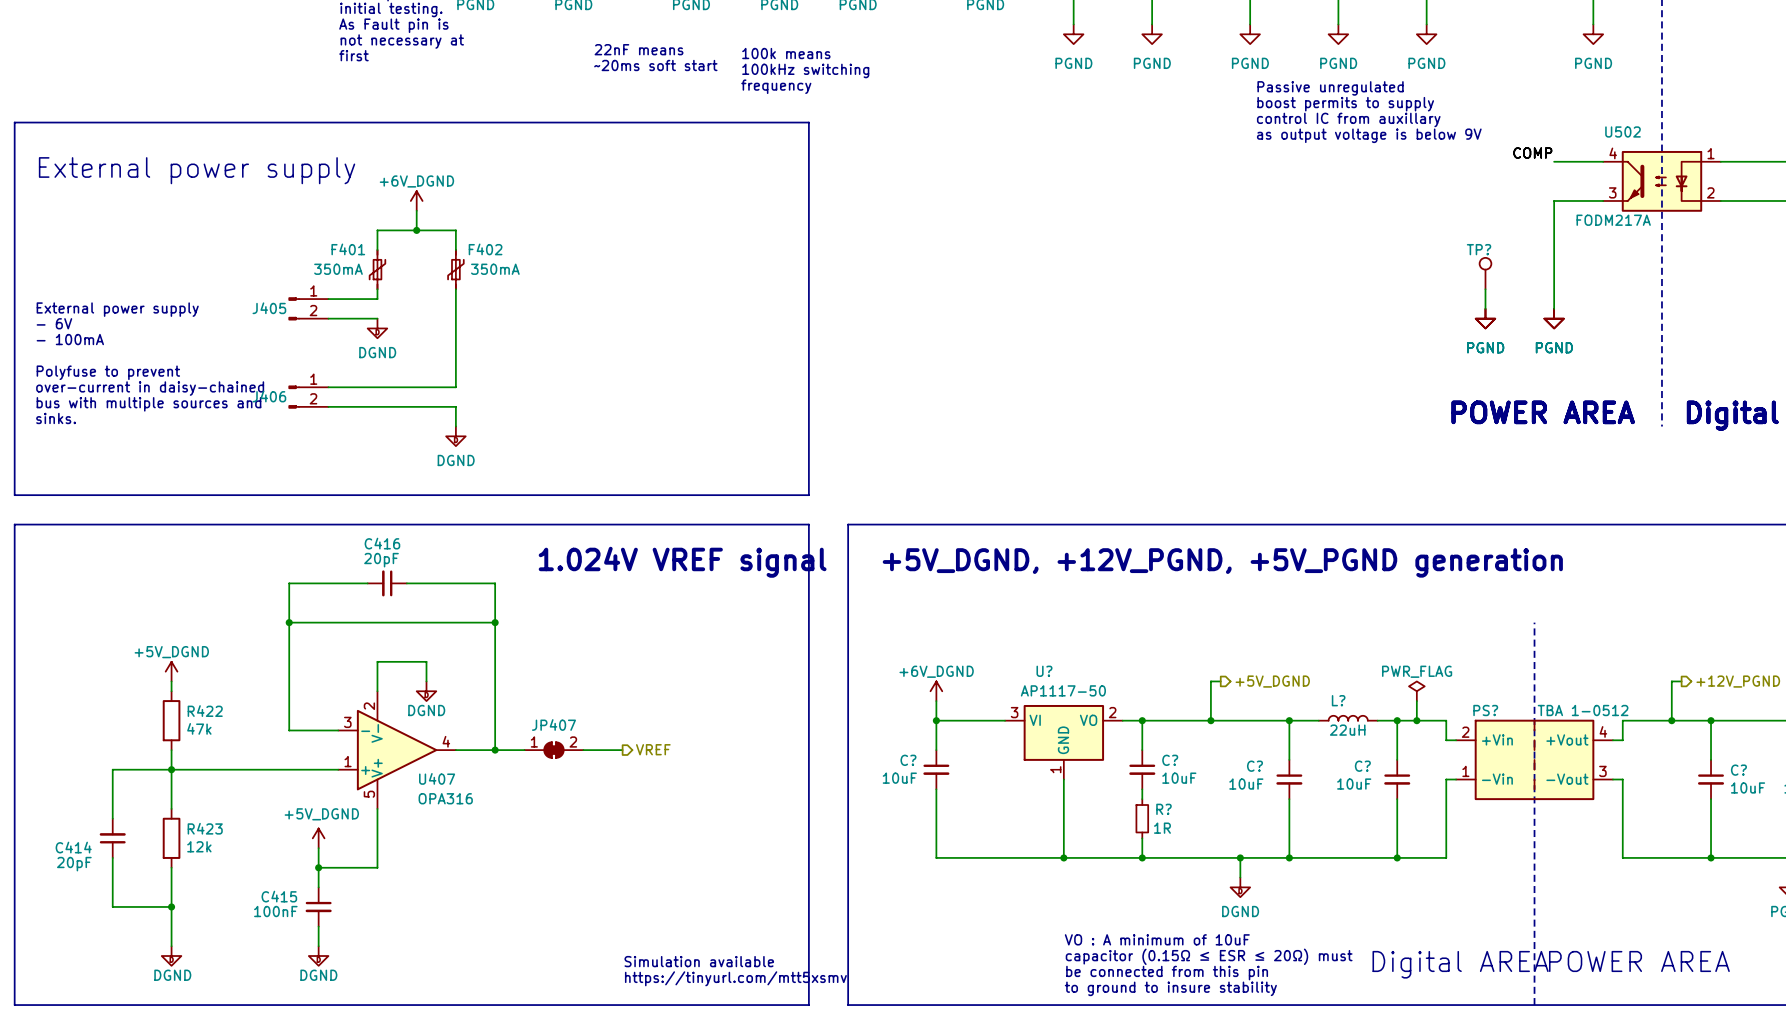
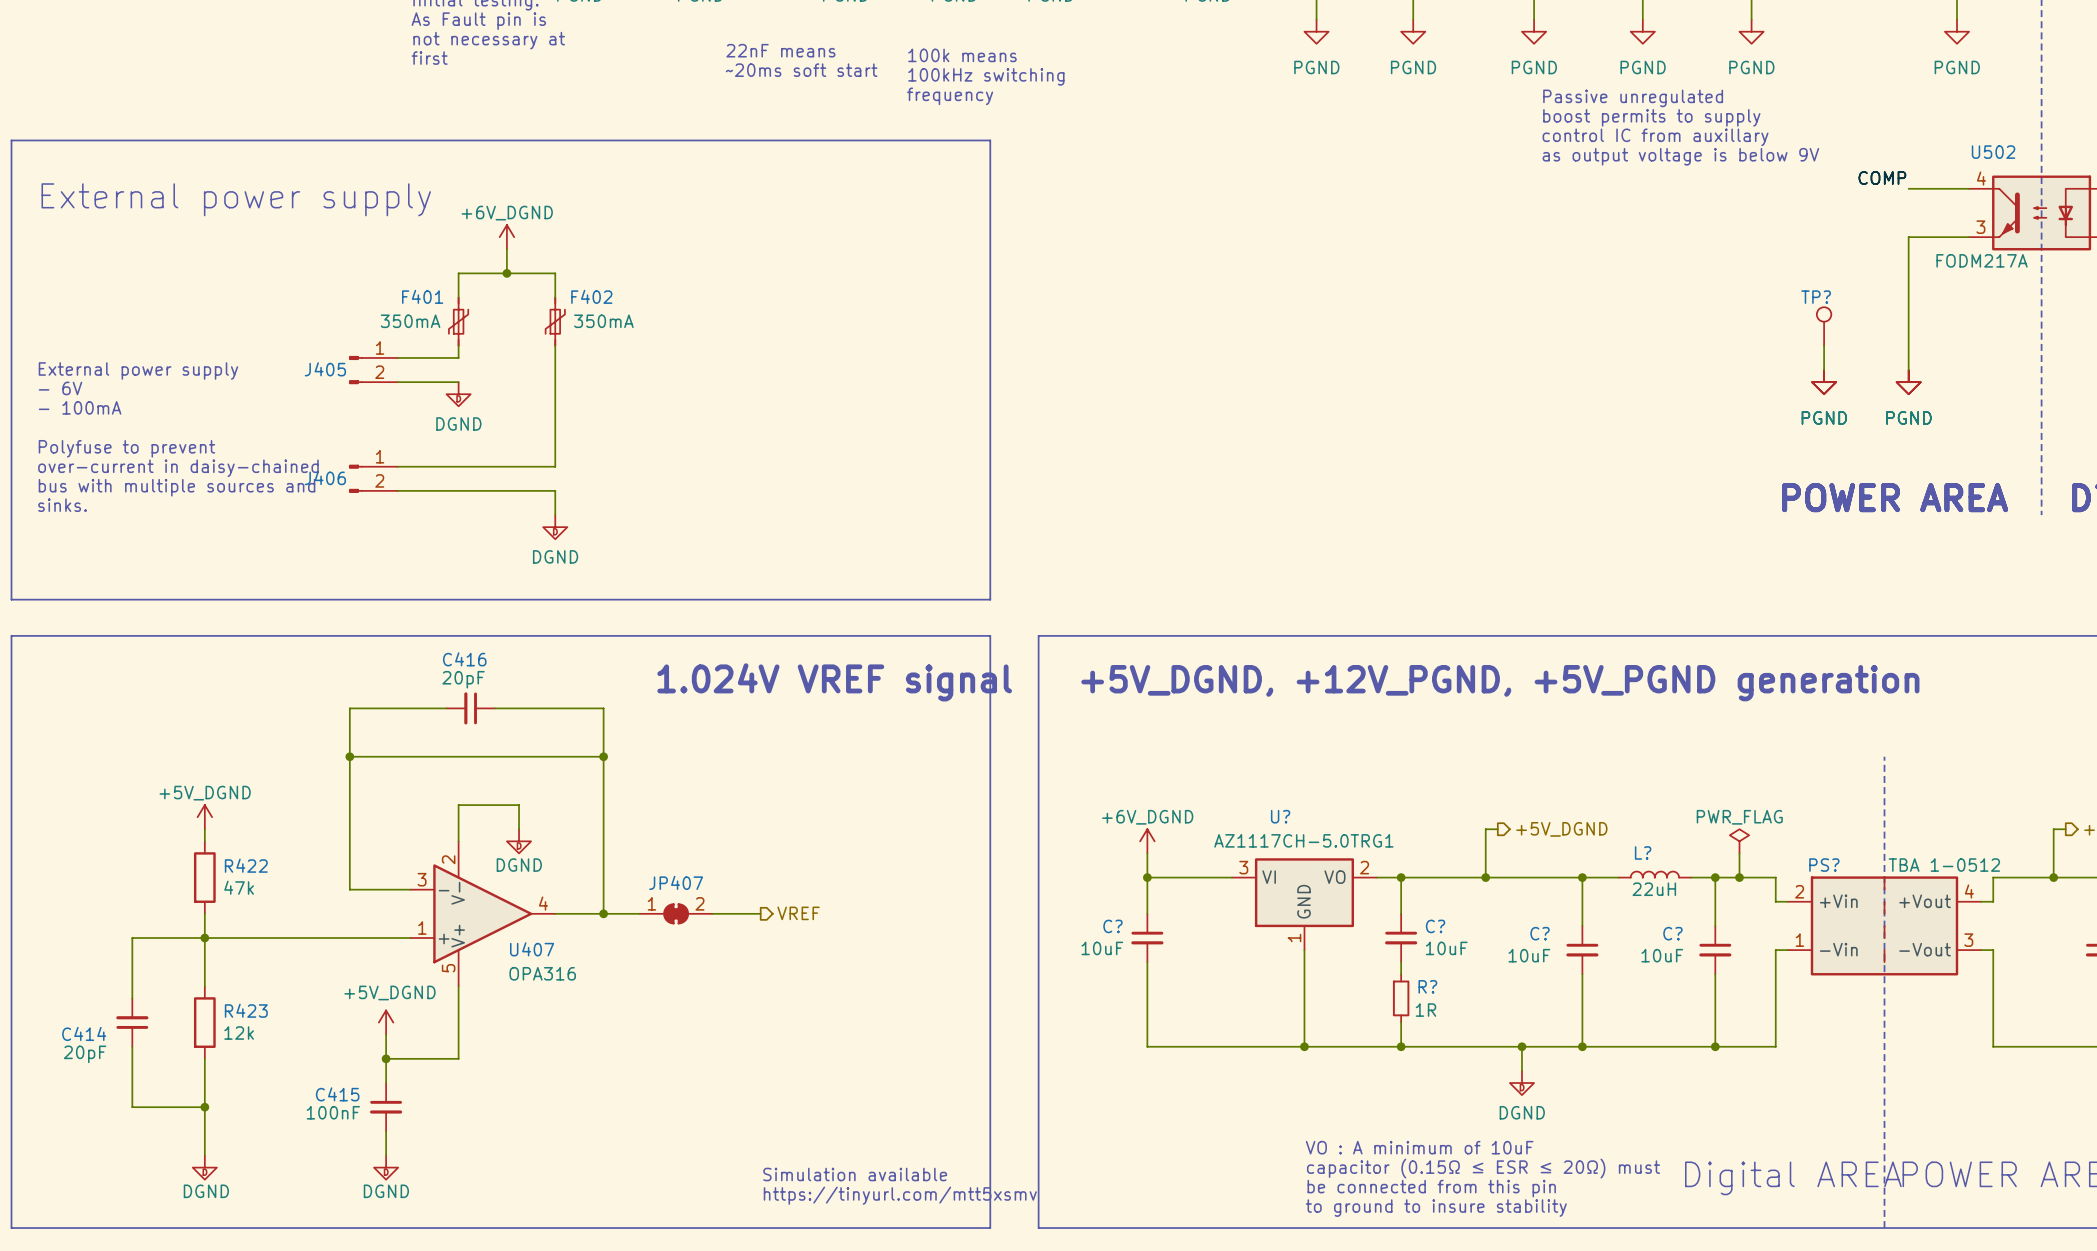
U? value: AP1117-50 (1063, 690) -> AZ1117CH-5.0TRG1 (1303, 840)

